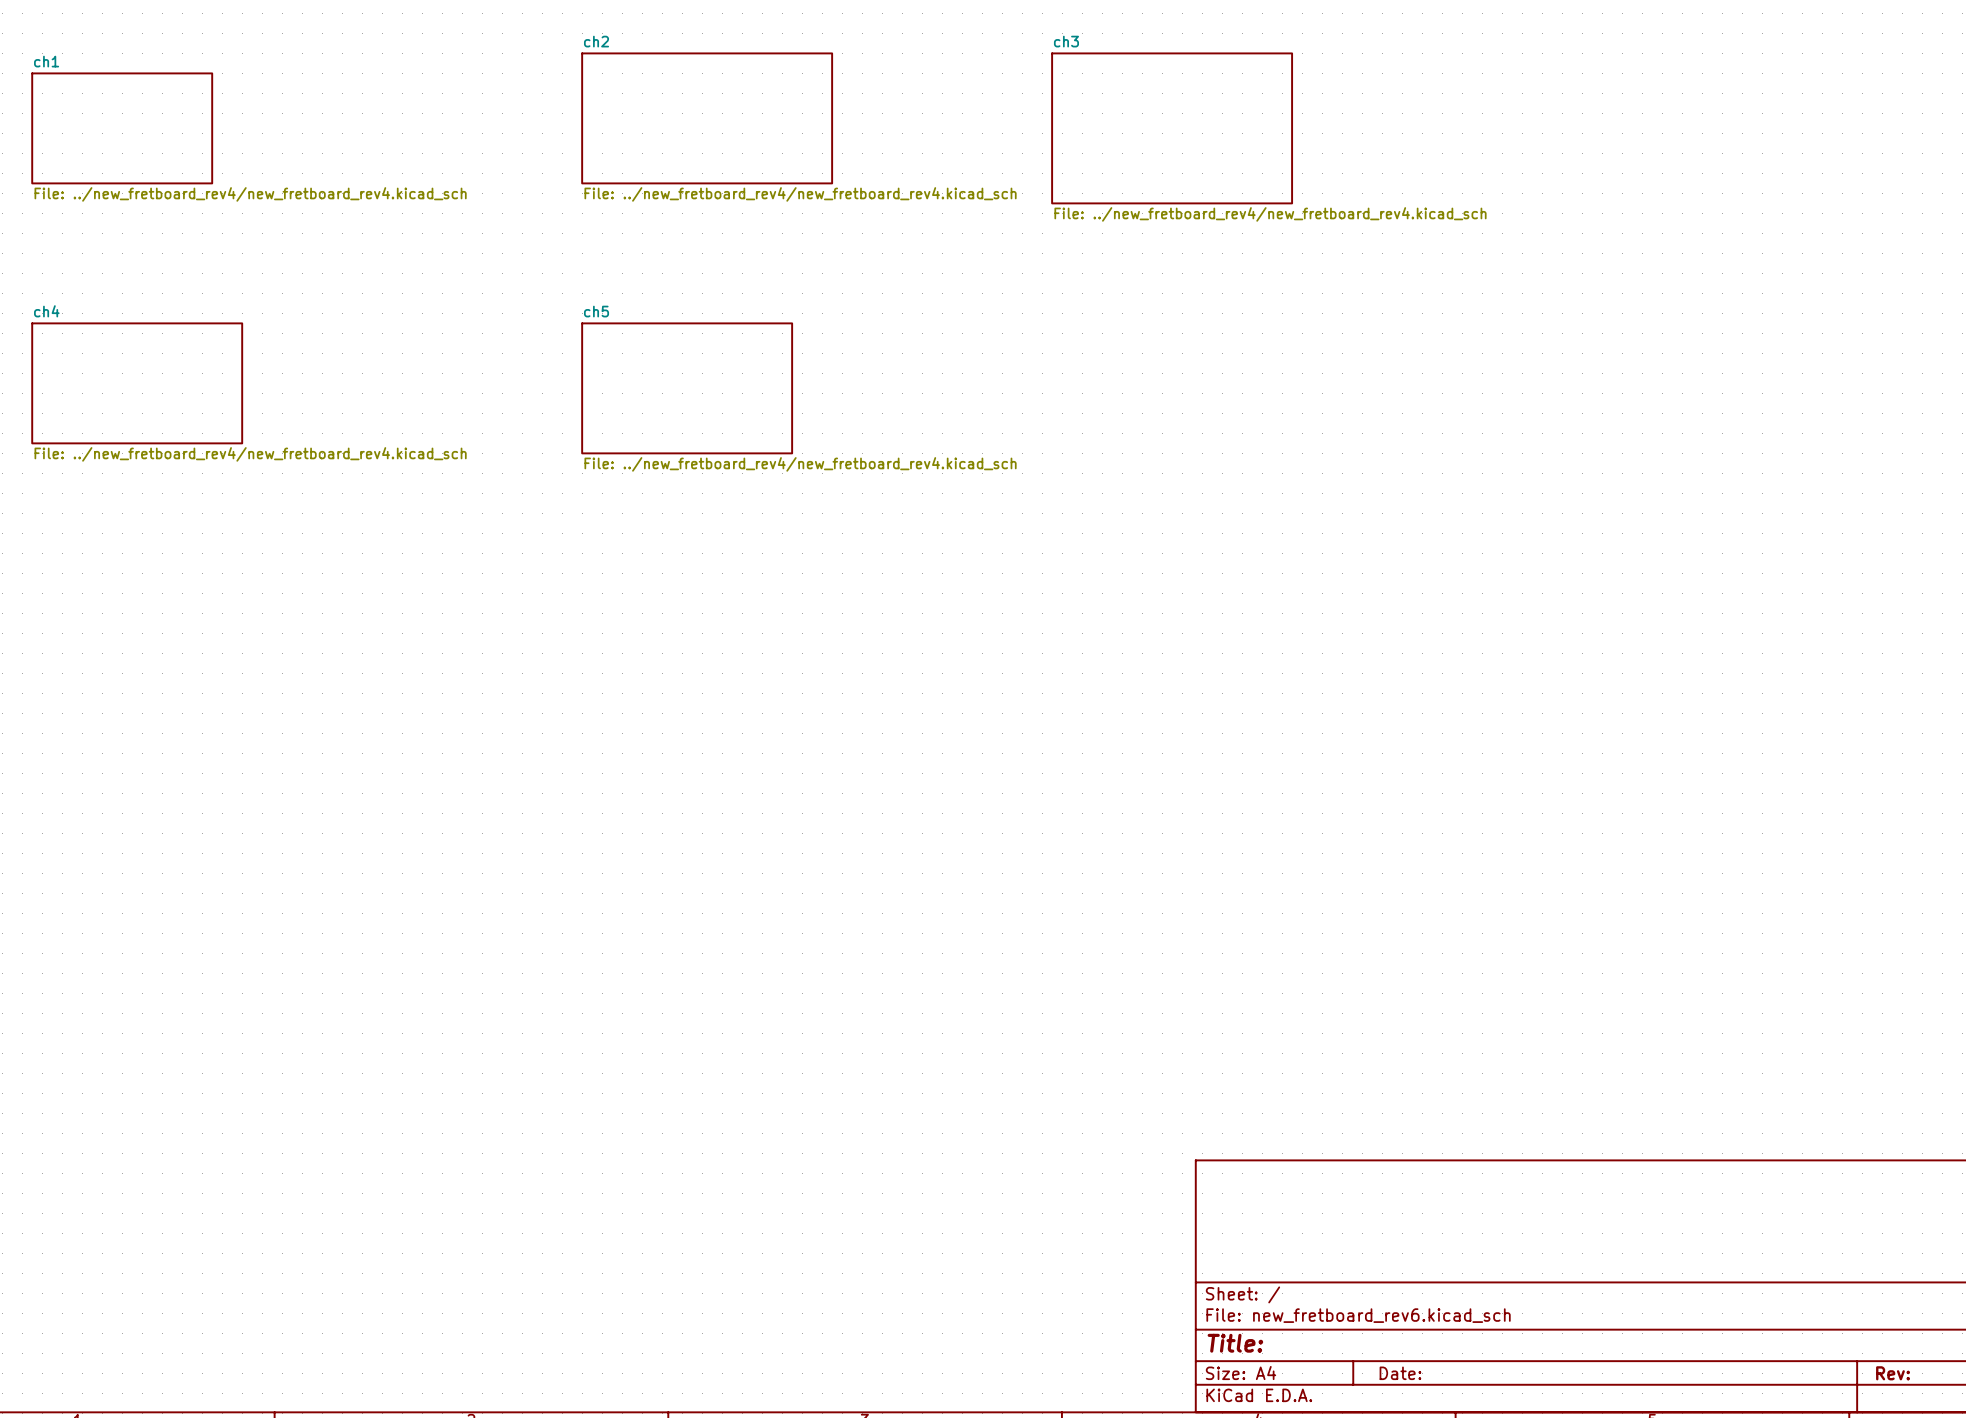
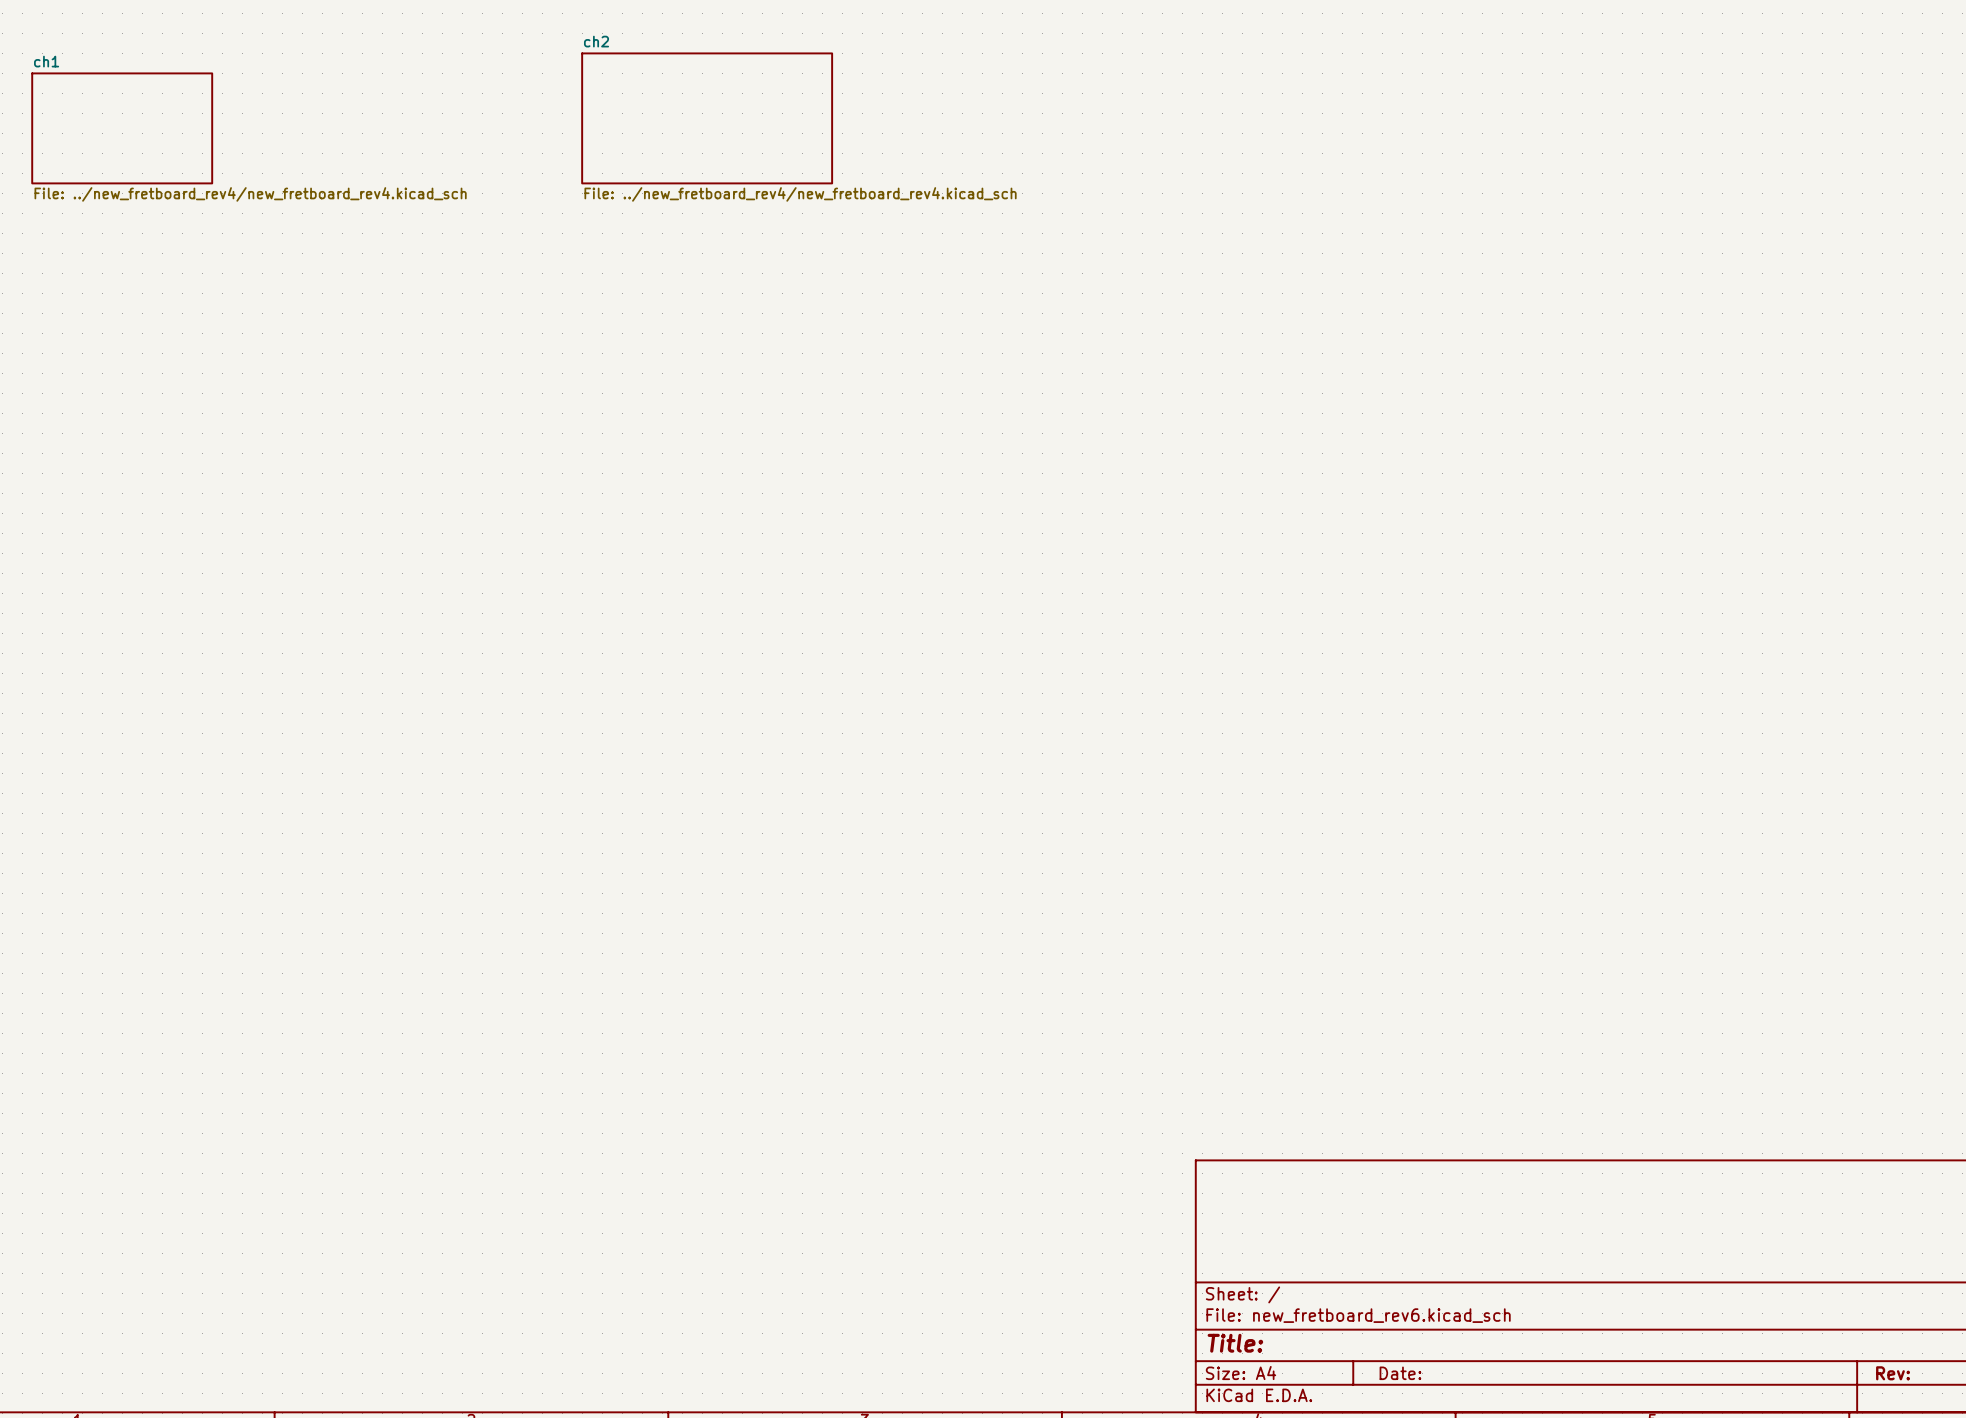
sheet ch3: File: ../new_fretboard_rev4/new_fretboard_rev4.kicad_sch (1172, 128) -> none
sheet ch4: File: ../new_fretboard_rev4/new_fretboard_rev4.kicad_sch (137, 383) -> none
sheet ch5: File: ../new_fretboard_rev4/new_fretboard_rev4.kicad_sch (687, 388) -> none

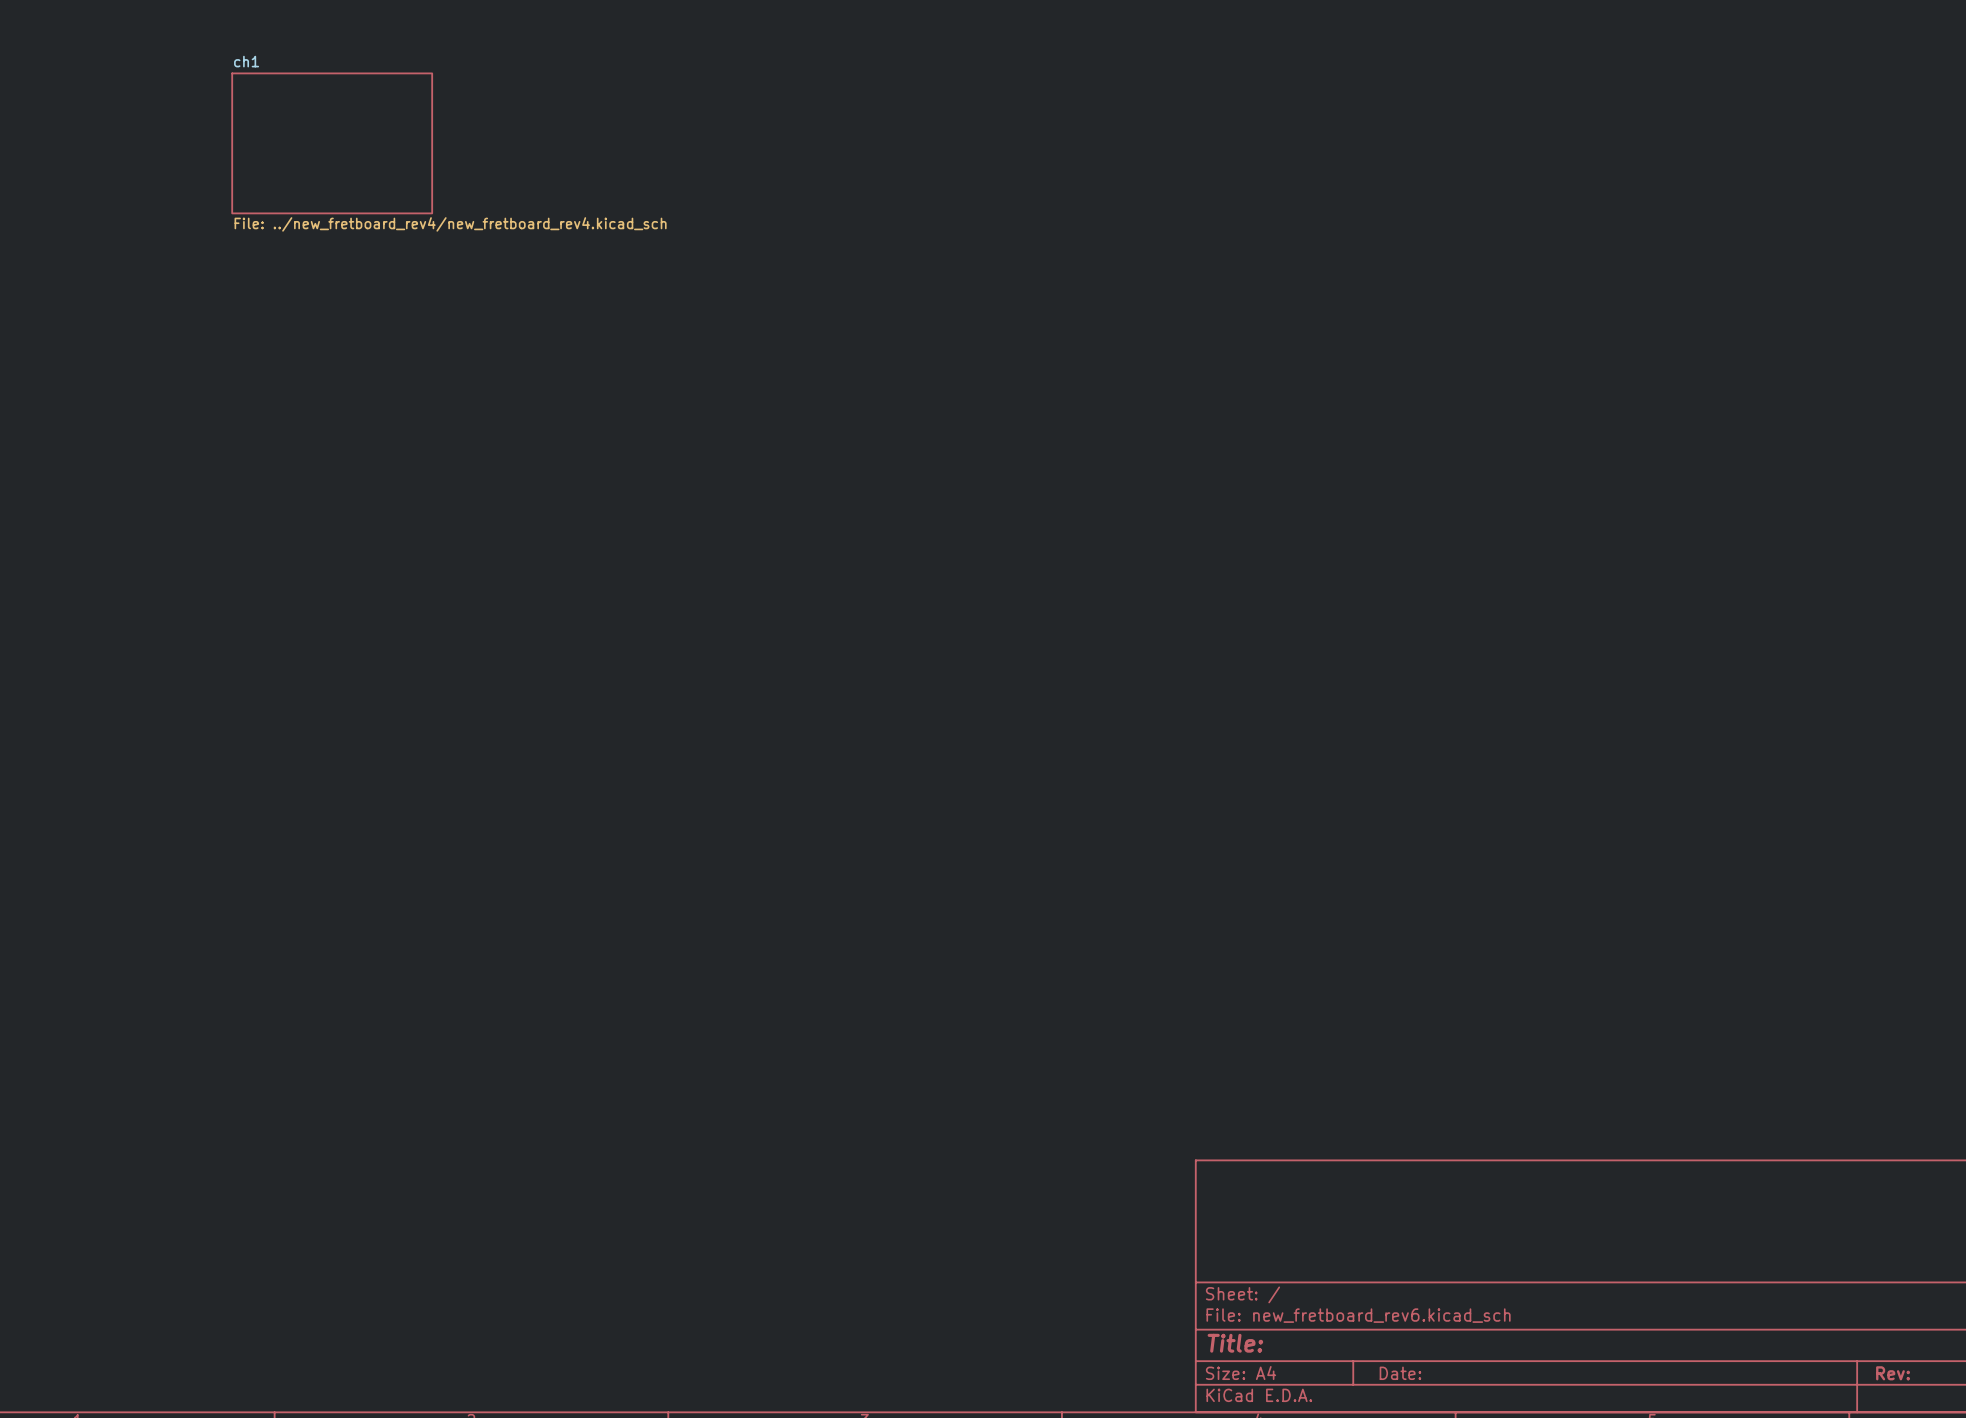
sheet ch1 name position: ch1 (46, 61) -> ch1 (246, 61)
sheet ch1 shape: [31, 72, 213, 184] -> [231, 72, 433, 214]
sheet ch2: File: ../new_fretboard_rev4/new_fretboard_rev4.kicad_sch (707, 118) -> none
sheet ch1 value position: File: ../new_fretboard_rev4/new_fretboard_rev4.kicad_sch (250, 194) -> File: ../new_fretboard_rev4/new_fretboard_rev4.kicad_sch (450, 224)

